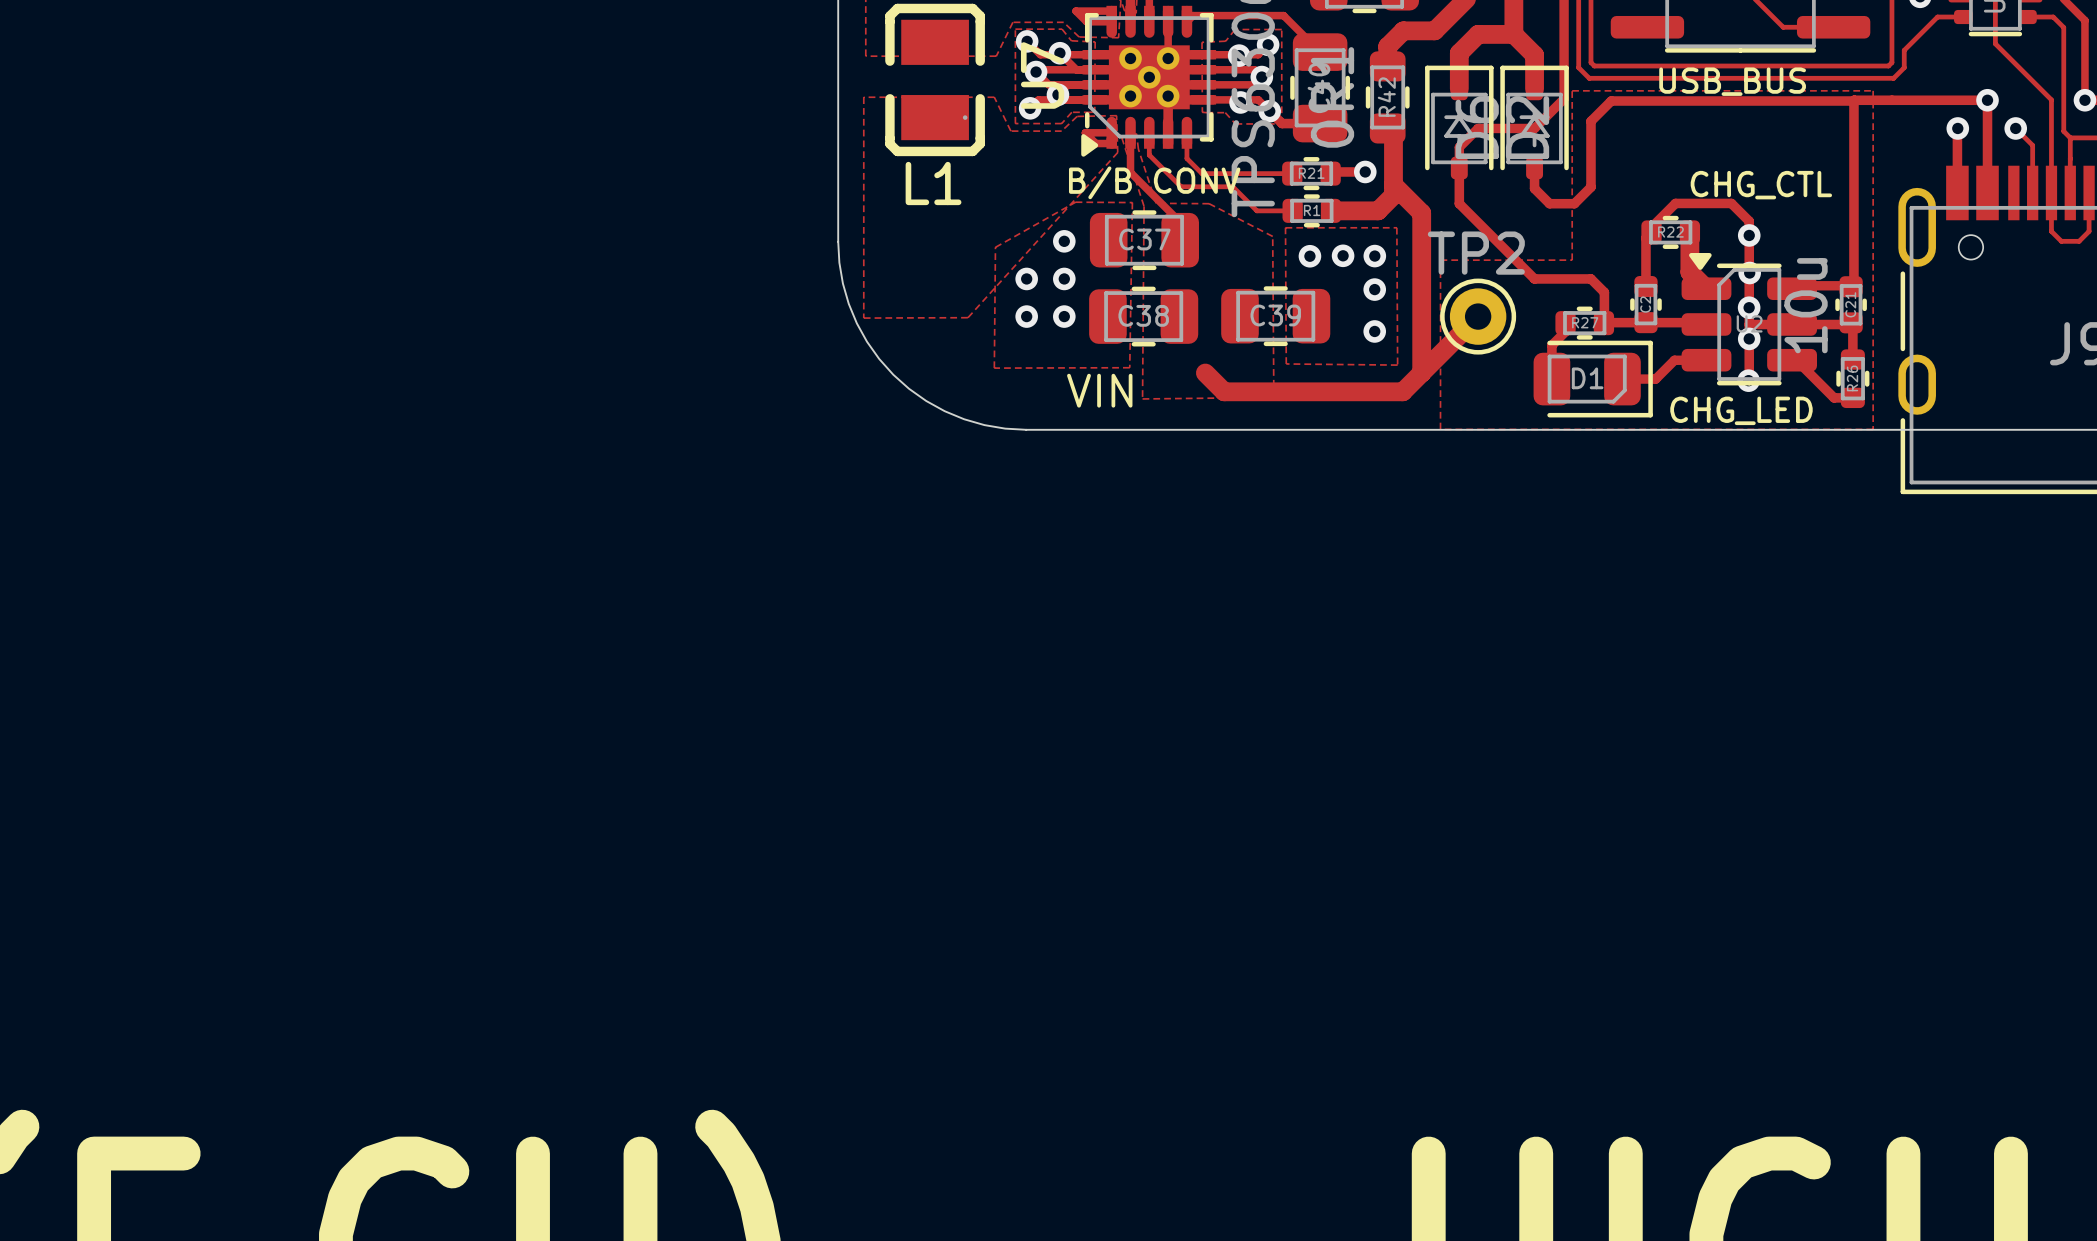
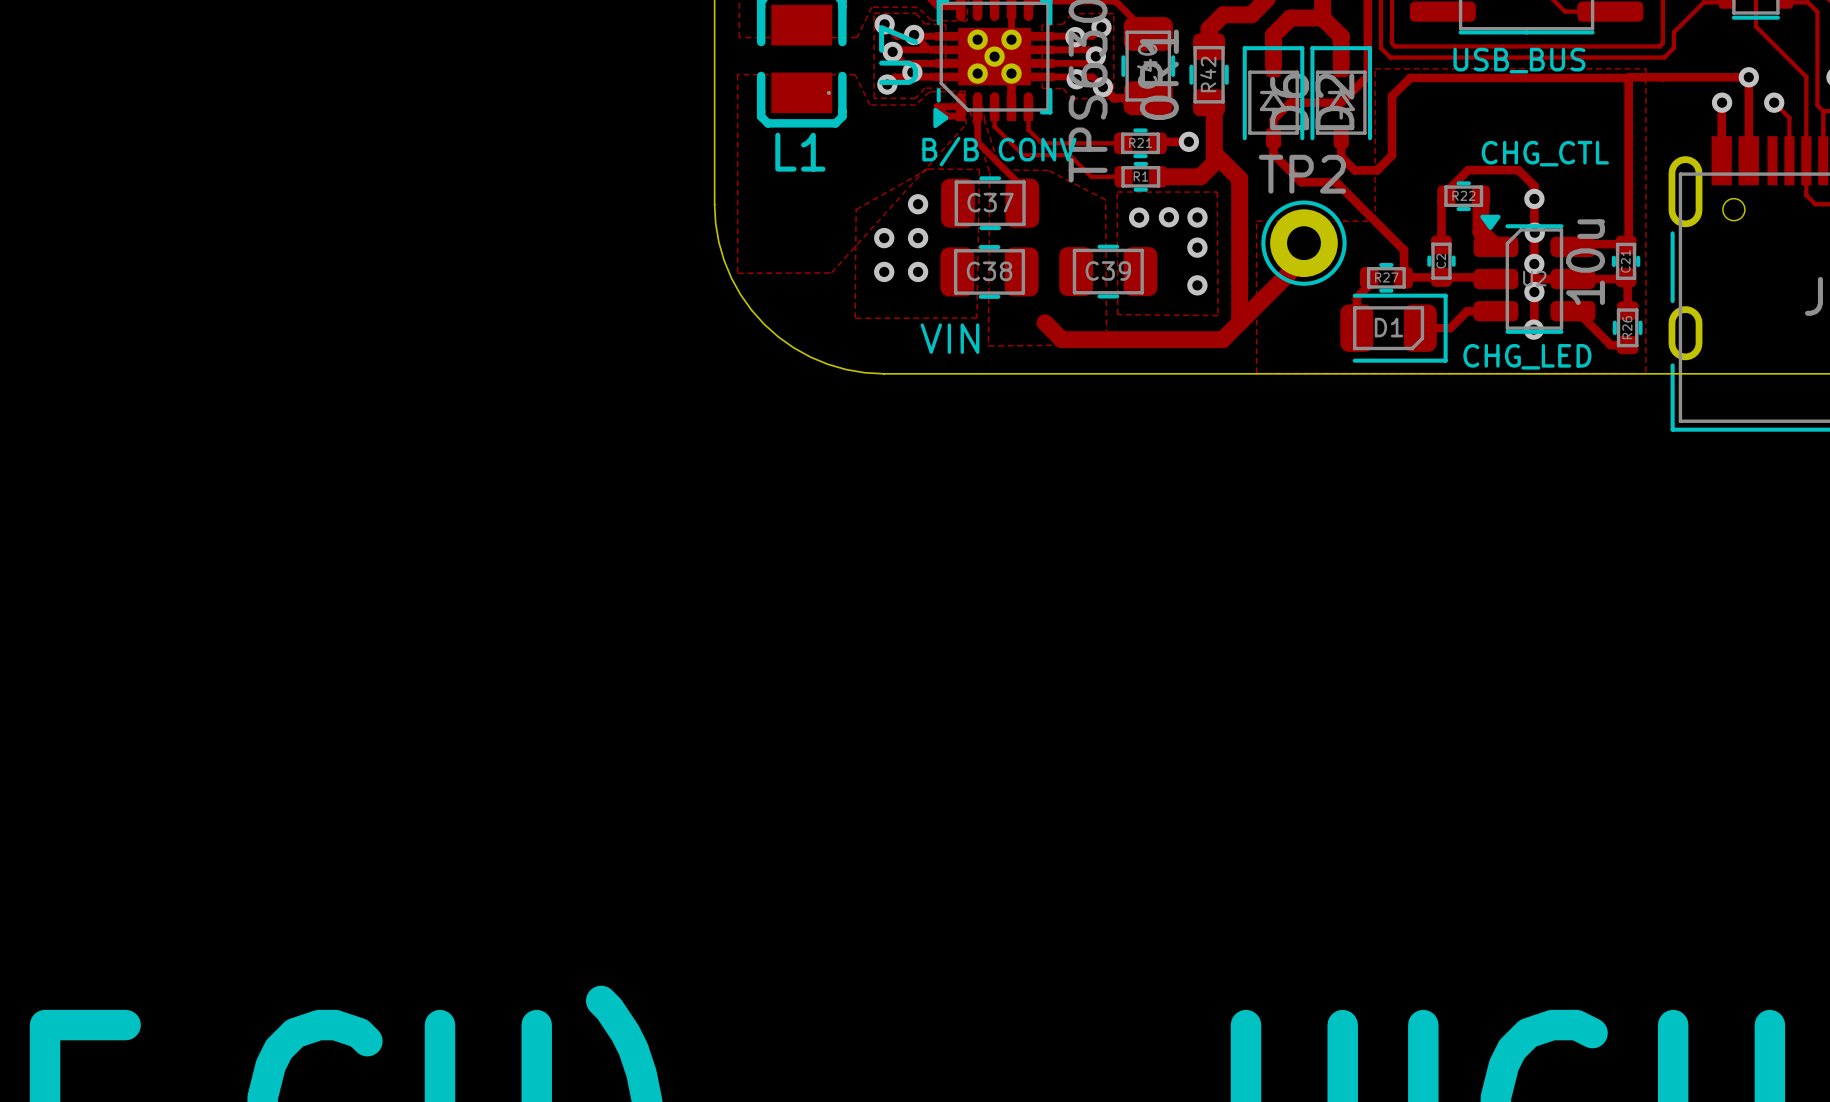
track: (1459, 185) (1459, 203) (1534, 278) (1590, 278) -> (1273, 154) (1301, 182) (1336, 182) (1392, 238)
TP2 footprint: [1440, 278, 1517, 355] -> [1261, 200, 1347, 286]

